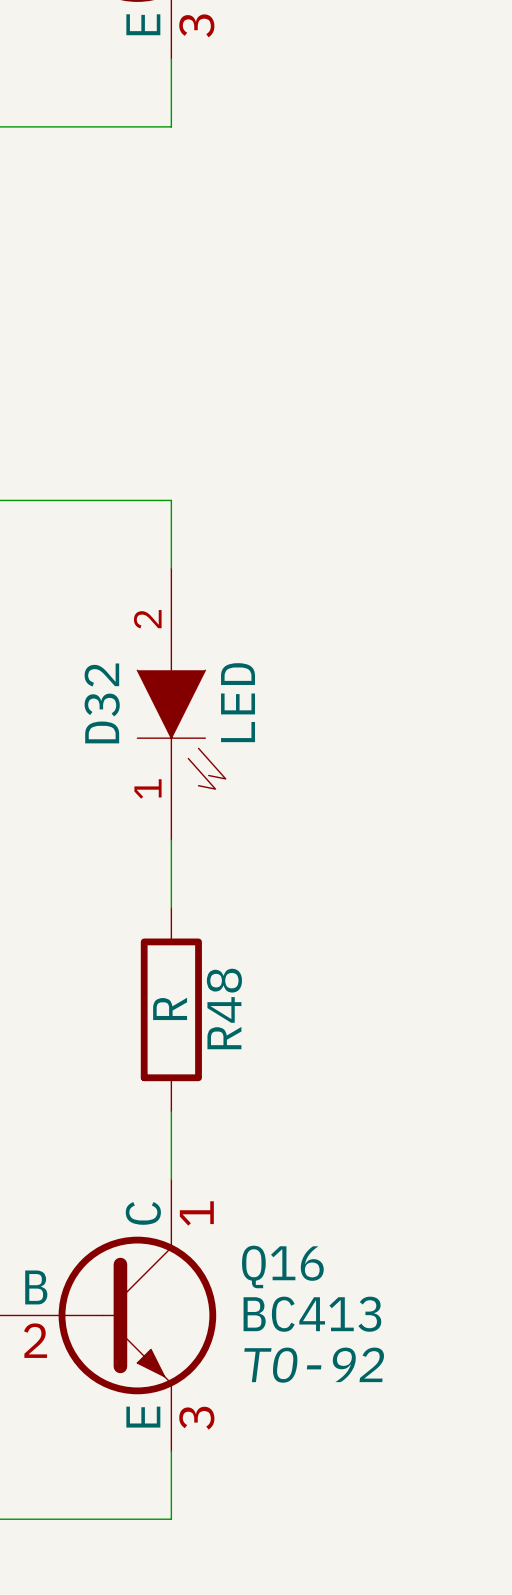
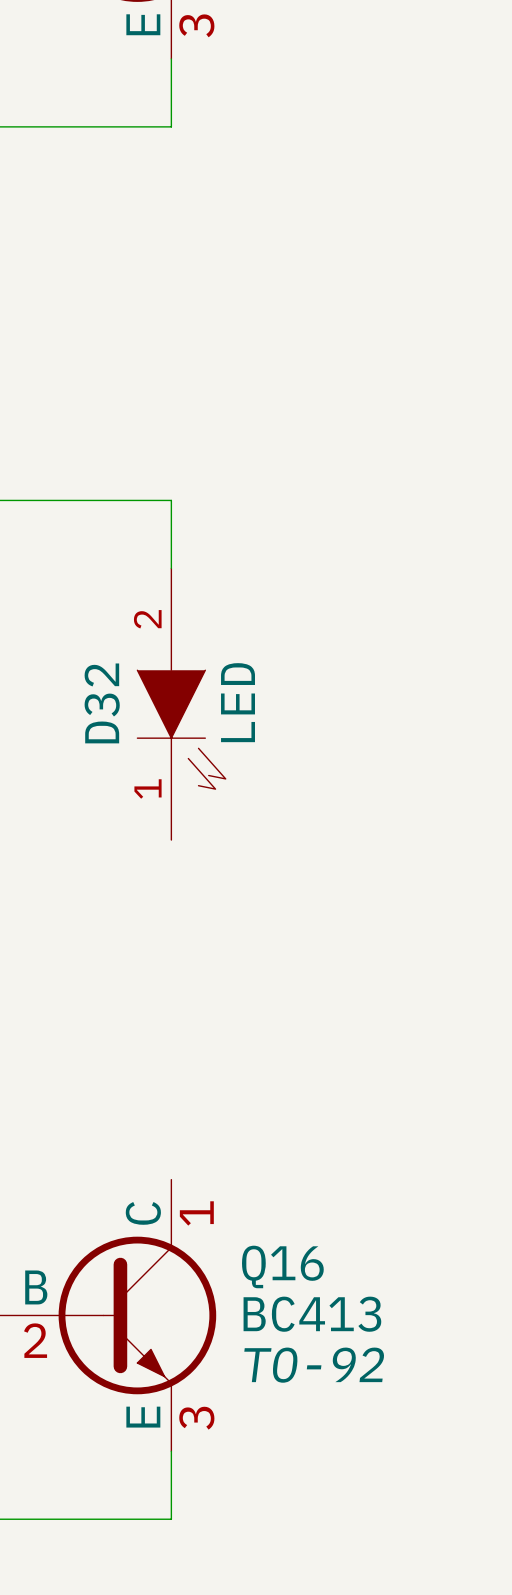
wire: (171, 840) (171, 907) -> none
R48: R (171, 1009) -> none
wire: (171, 1111) (171, 1179) -> none

